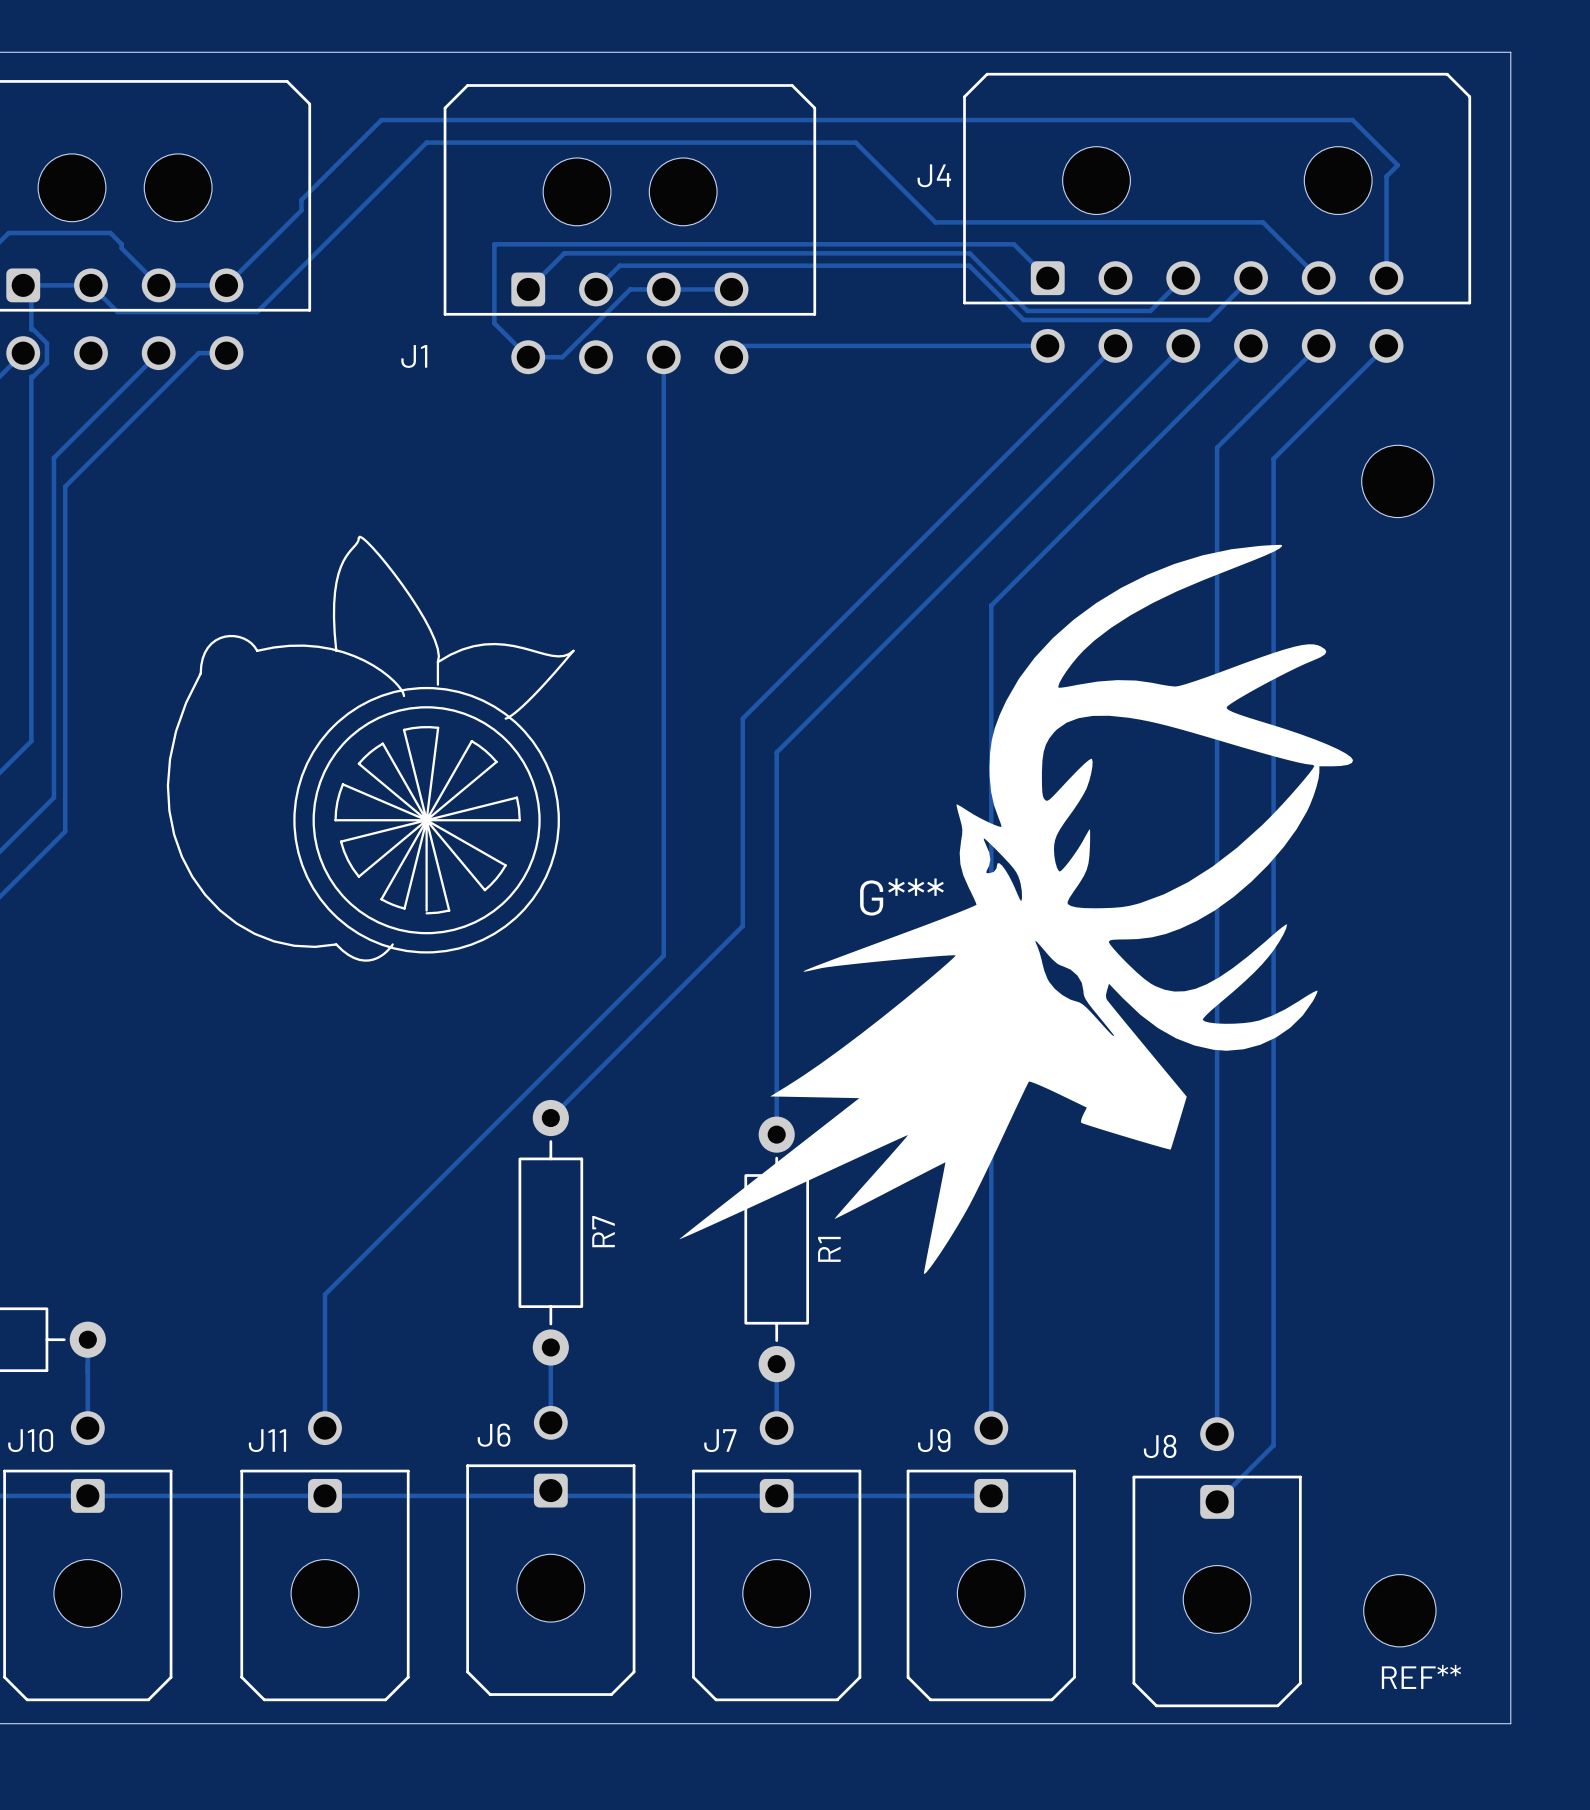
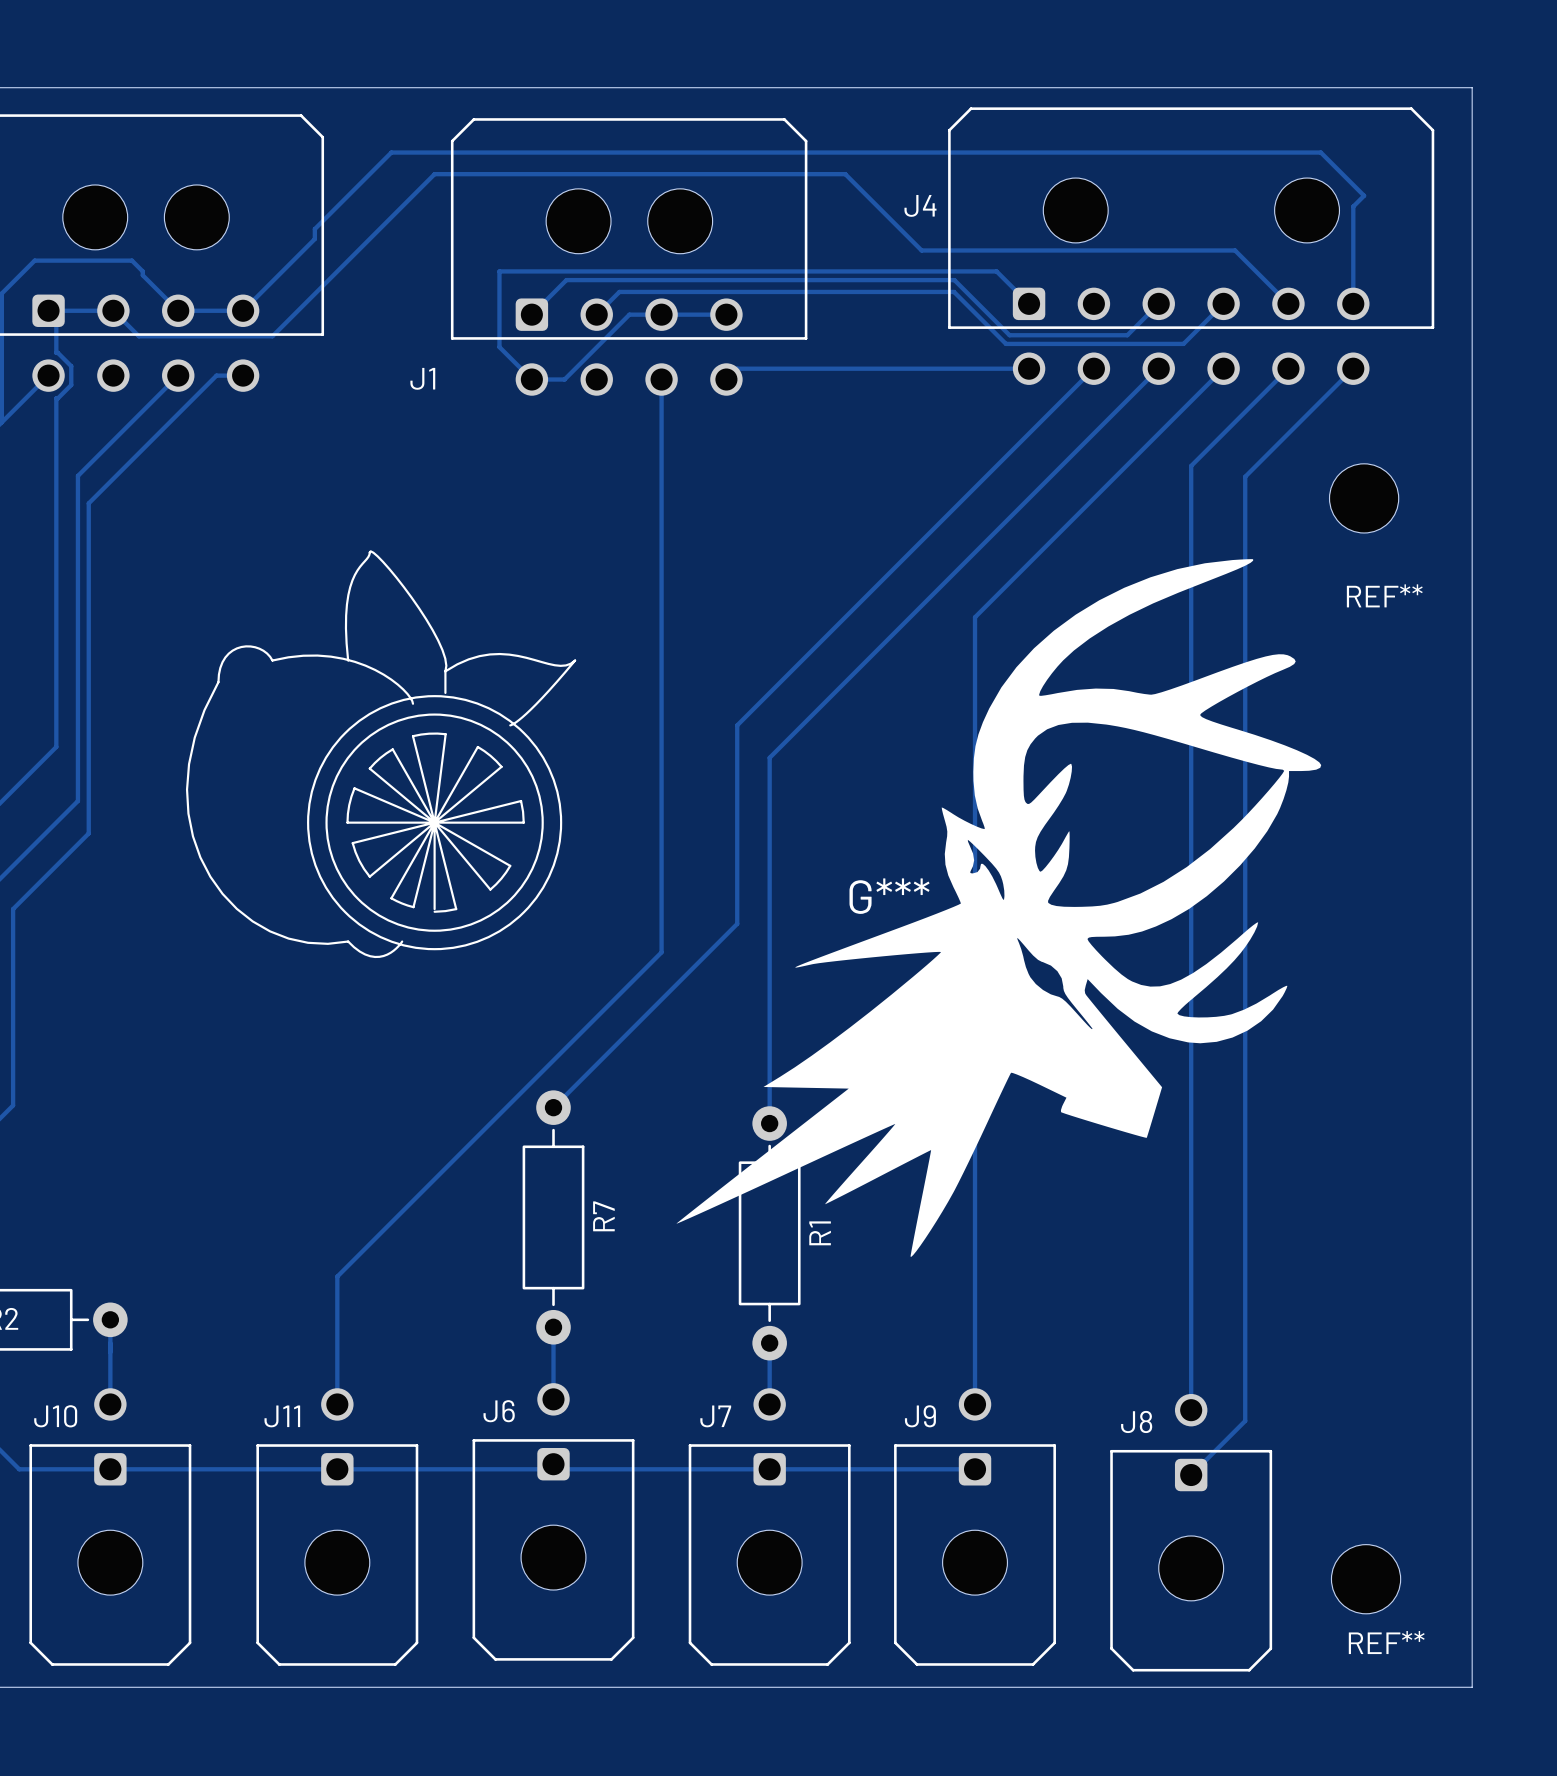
REF** name: none -> REF** (1384, 595)

